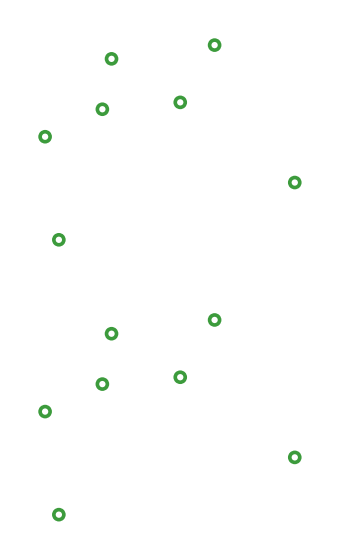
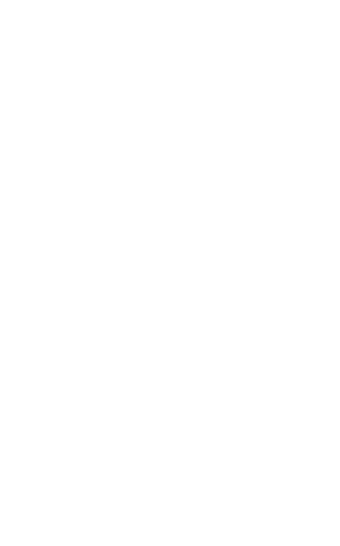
via: (214, 45) -> none
via: (111, 58) -> none
via: (180, 102) -> none
via: (102, 109) -> none
via: (45, 136) -> none
via: (294, 182) -> none
via: (58, 239) -> none
via: (214, 319) -> none
via: (111, 333) -> none
via: (180, 377) -> none
via: (102, 384) -> none
via: (45, 411) -> none
via: (294, 457) -> none
via: (58, 514) -> none

